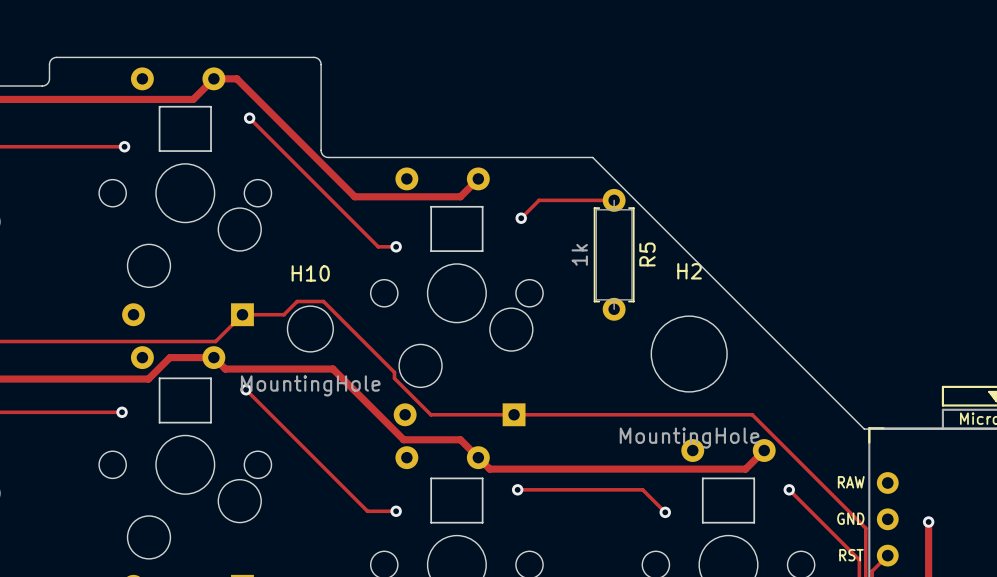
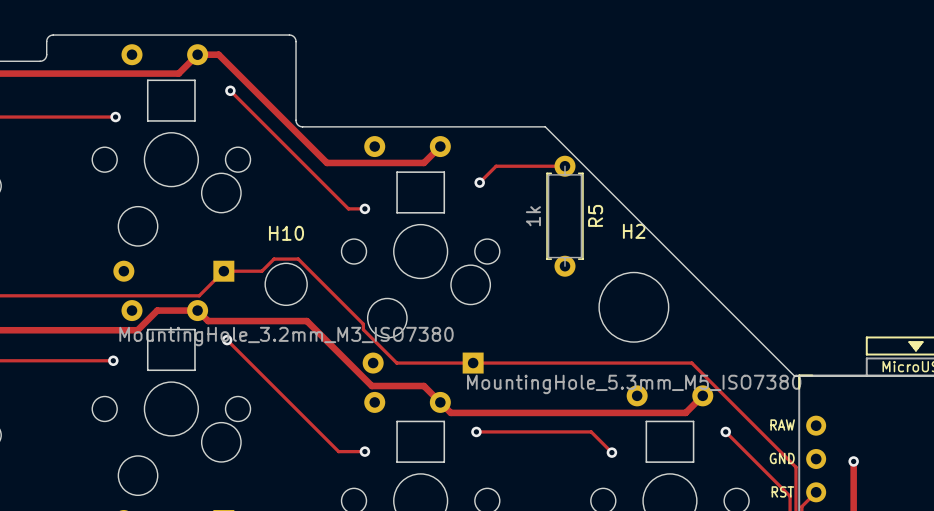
H10 value: MountingHole (310, 385) -> MountingHole_3.2mm_M3_ISO7380 (286, 336)
H2 value: MountingHole (689, 438) -> MountingHole_5.3mm_M5_ISO7380 (634, 384)

